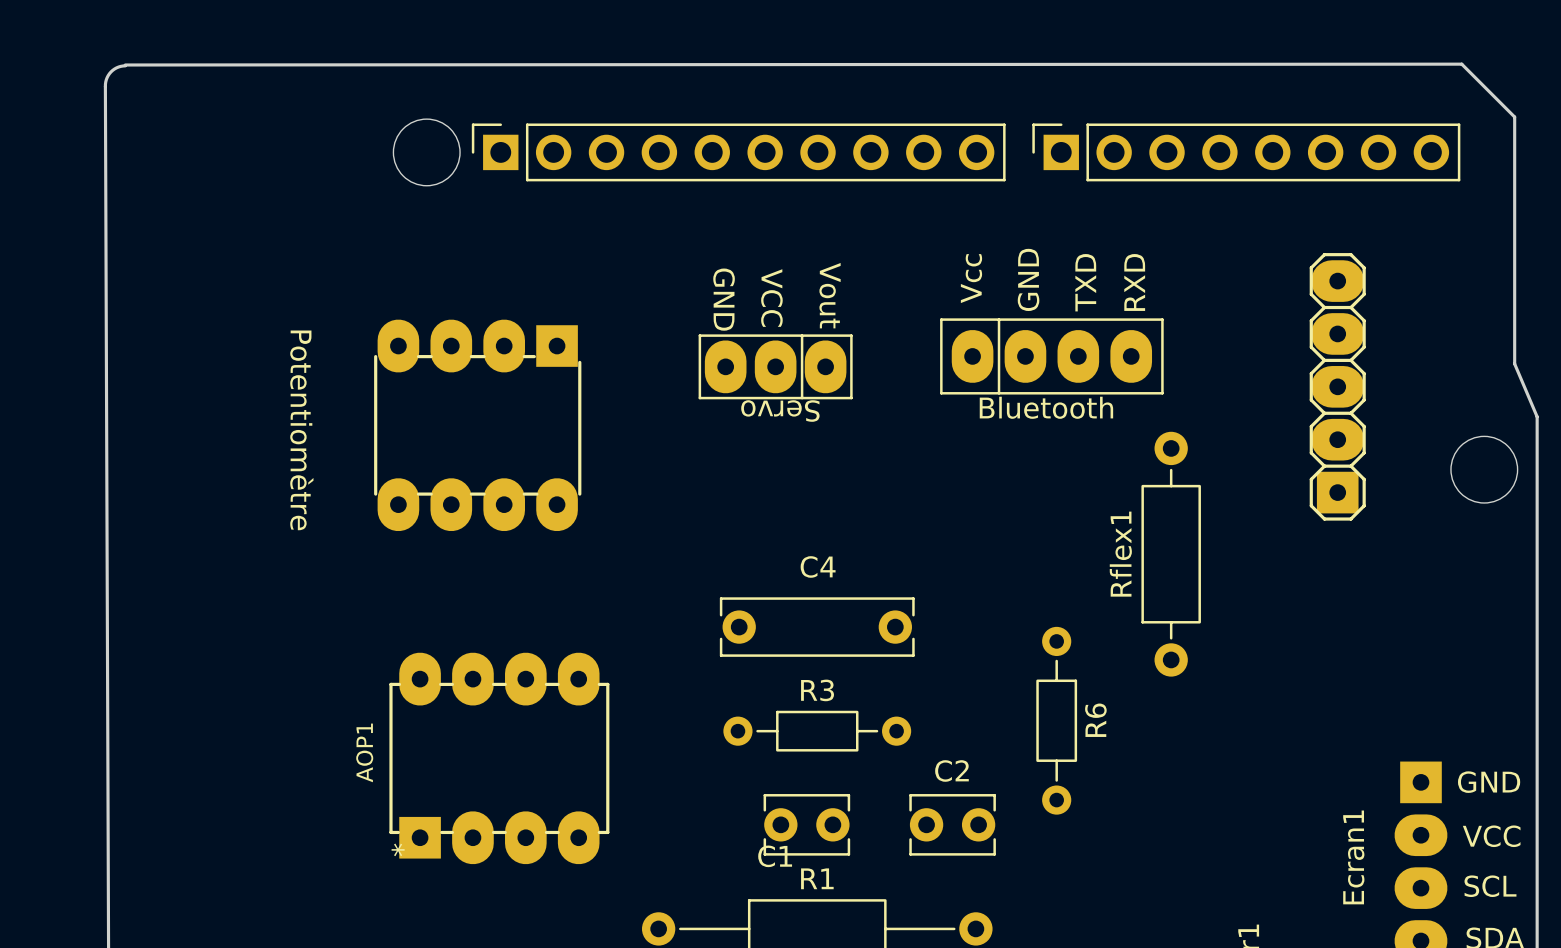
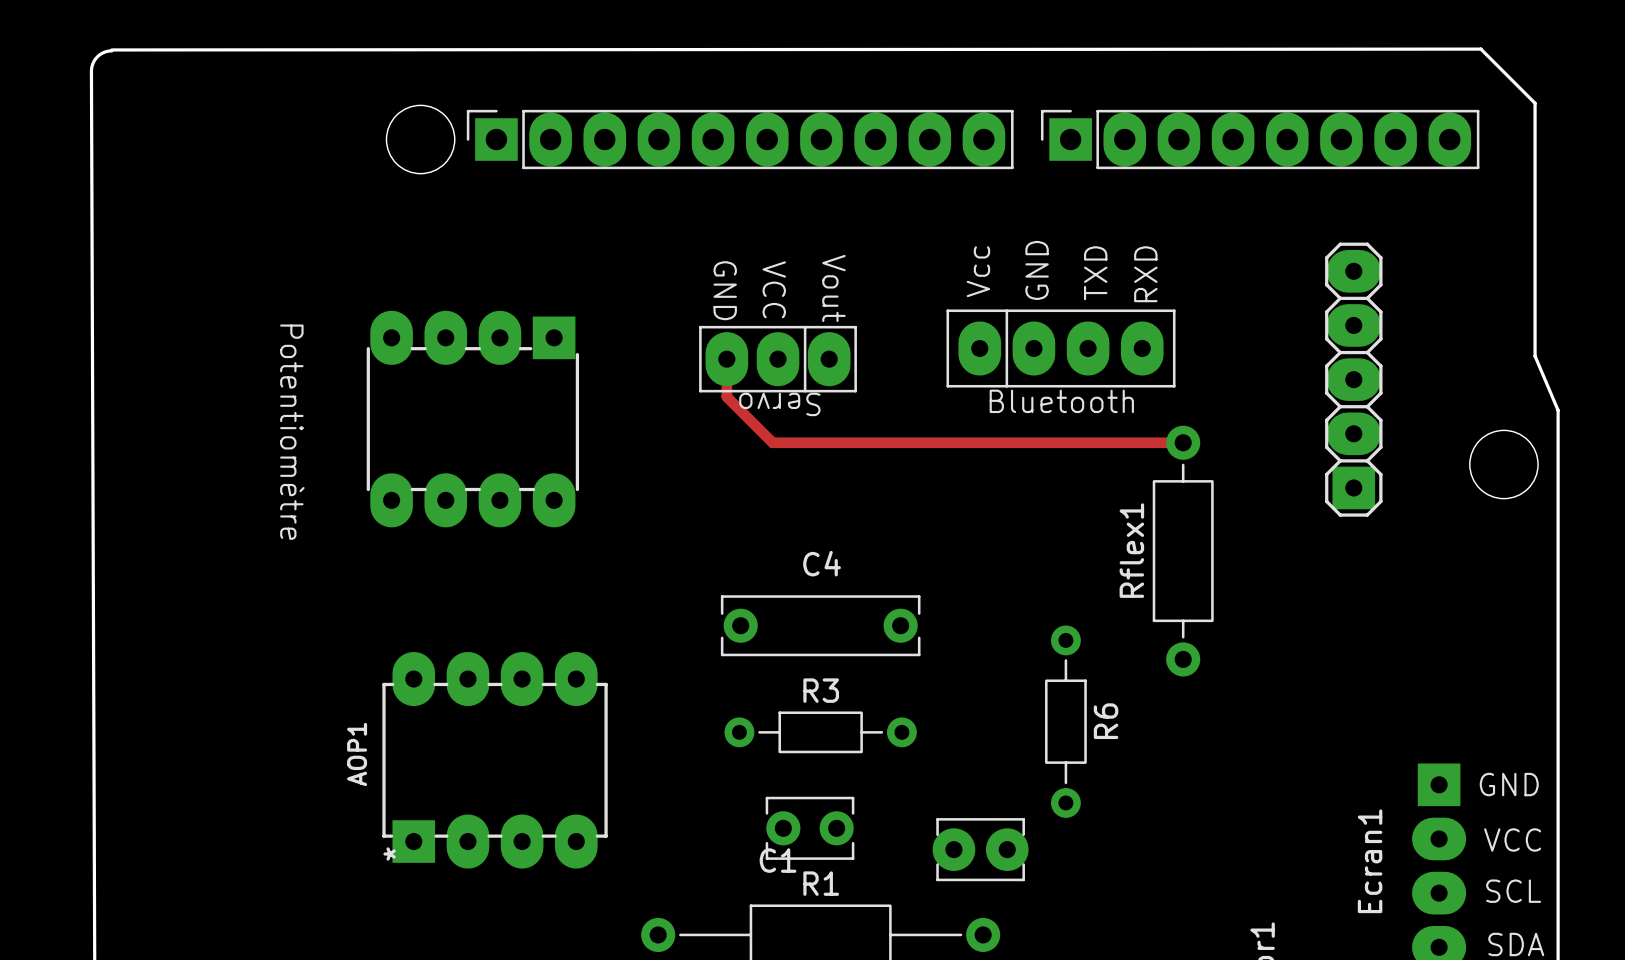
part footprint: [471, 123, 1006, 182] -> [466, 109, 1014, 170]
part footprint: [1032, 123, 1461, 182] -> [1040, 109, 1480, 170]
track: none -> (726, 359) (726, 396) (772, 442) (1183, 442)
C2: (952, 824) -> none
part: none -> (980, 849)

